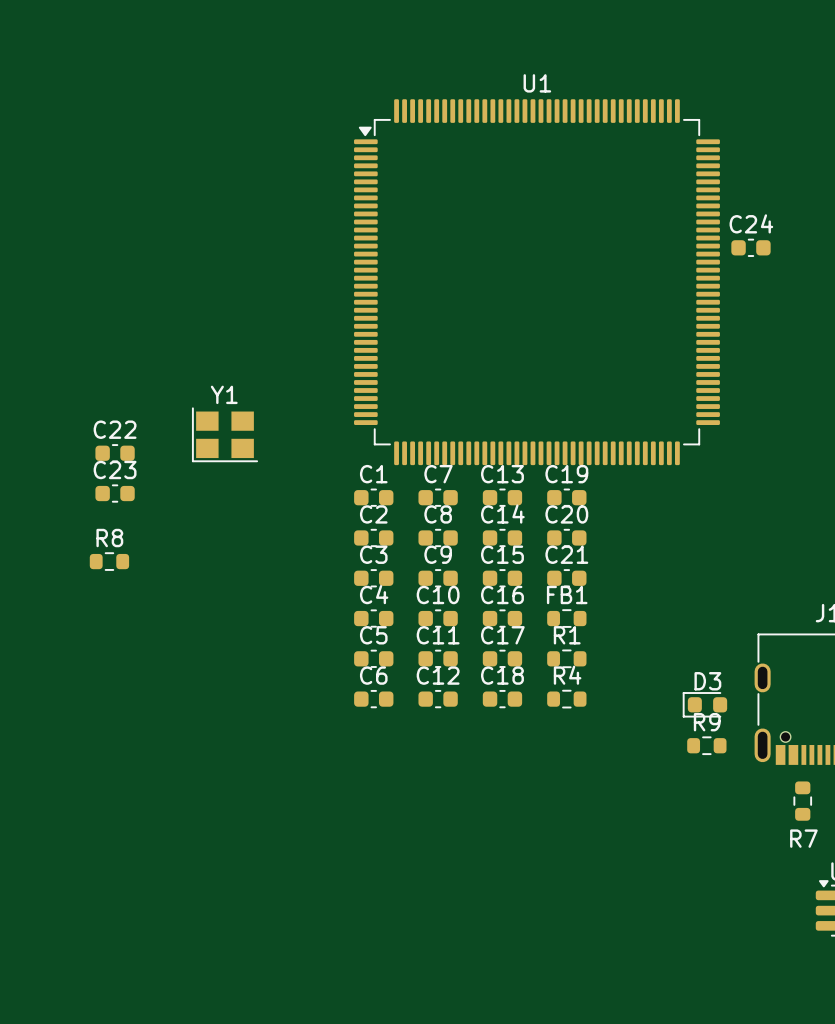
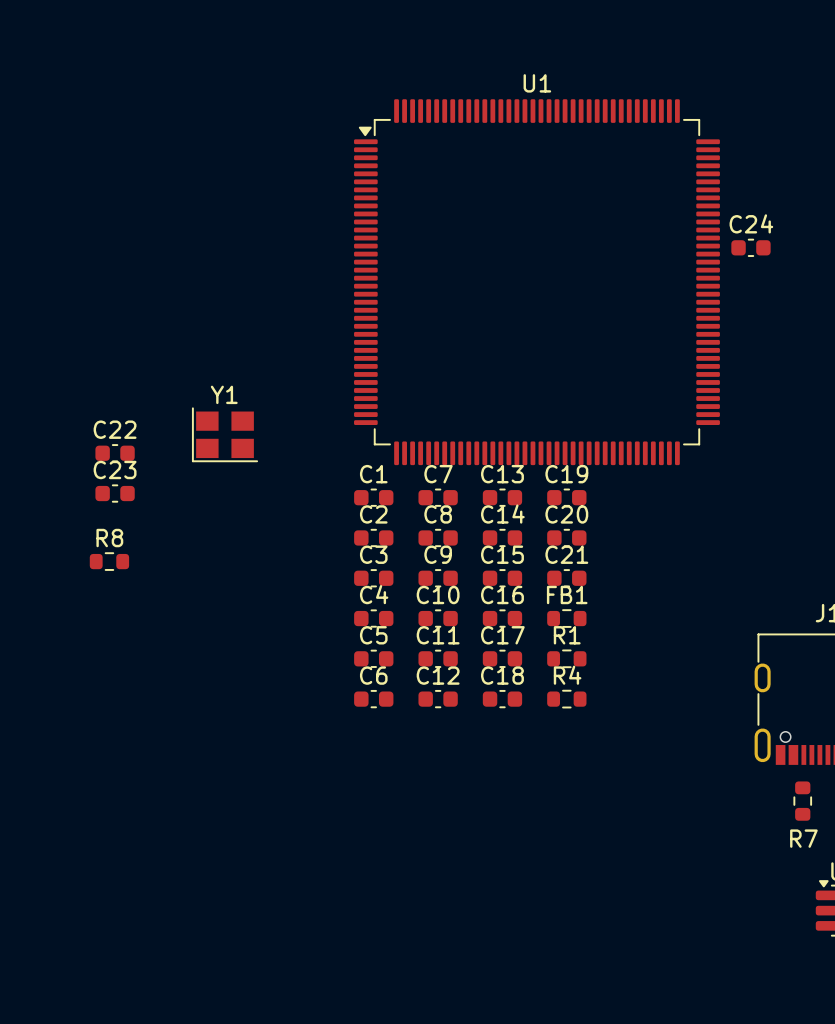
D3: (704, 704) -> none
R9: (706, 745) -> none

